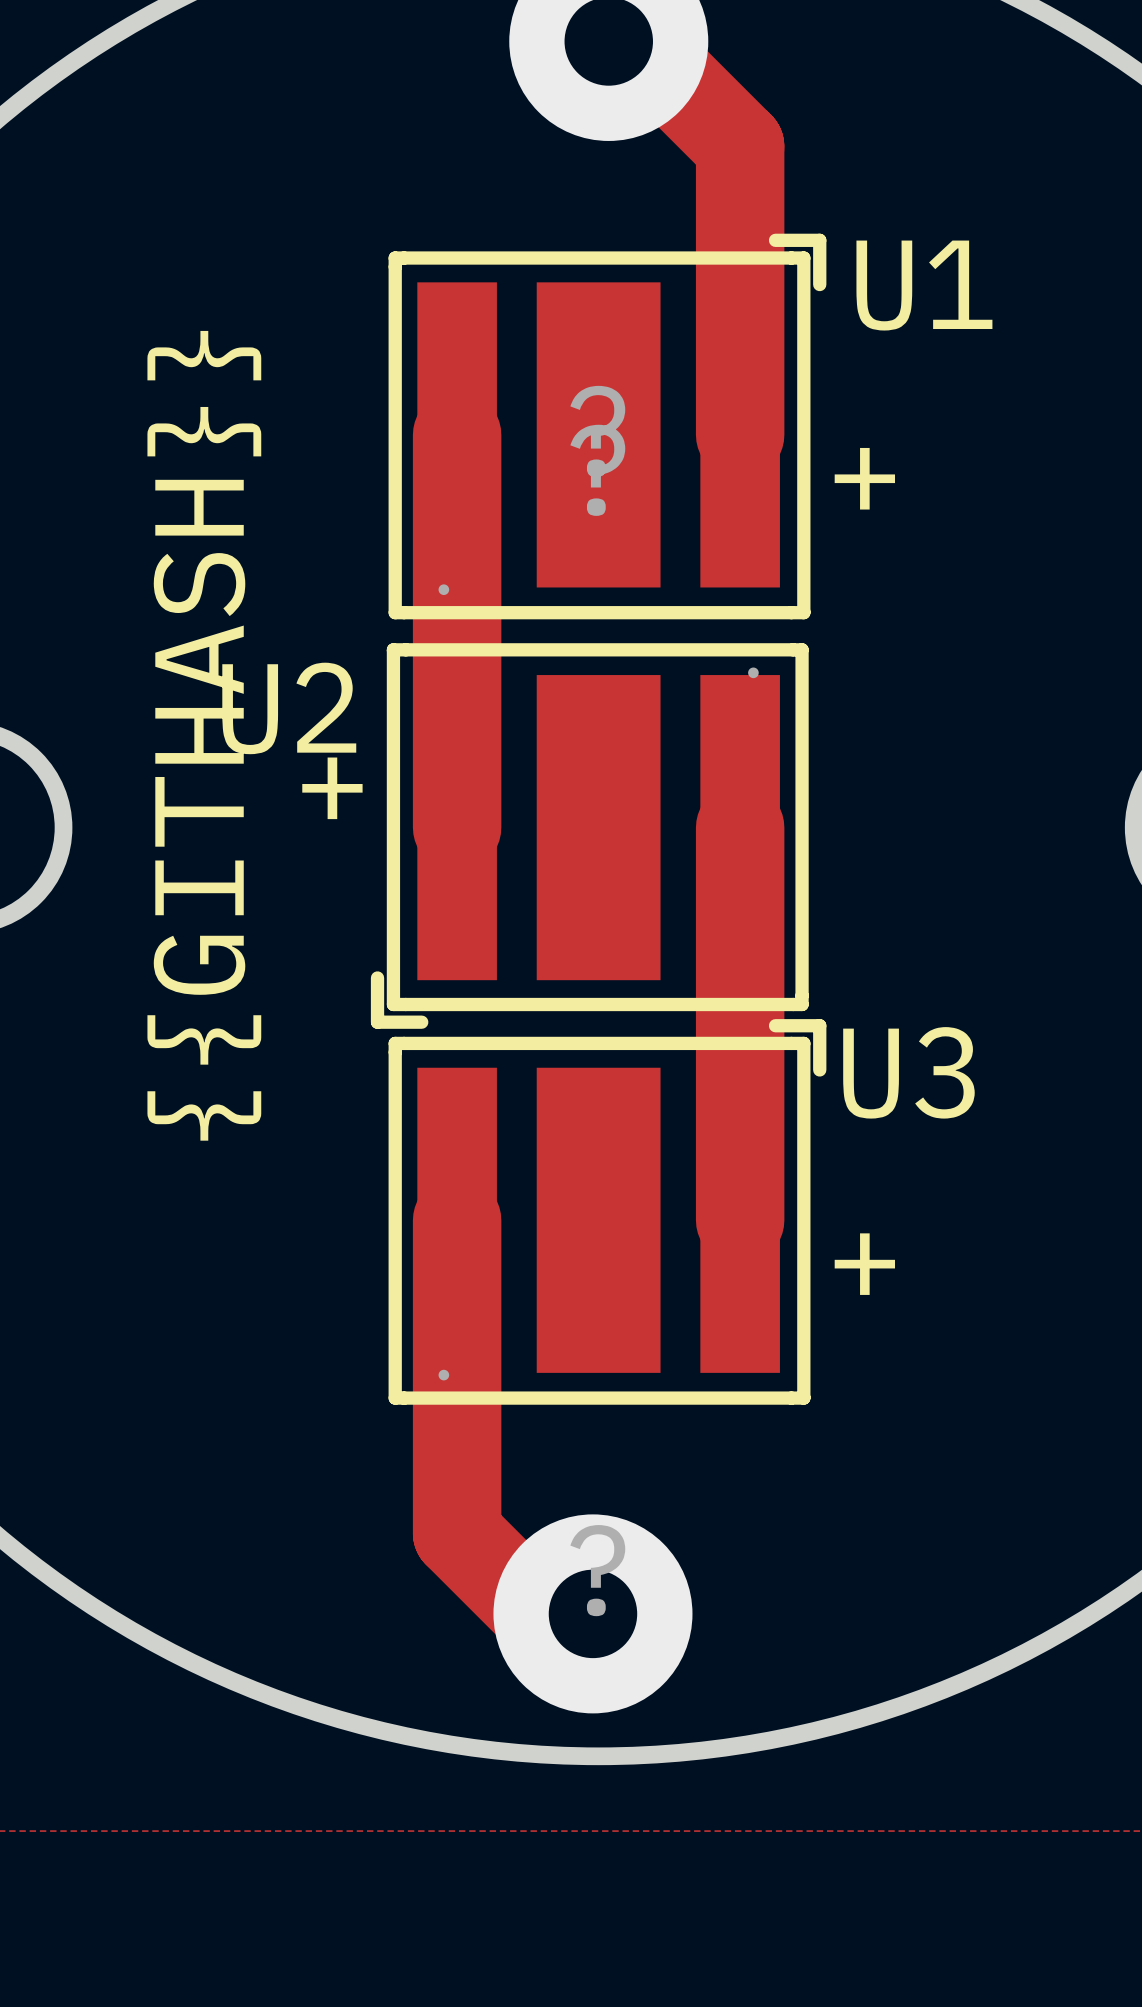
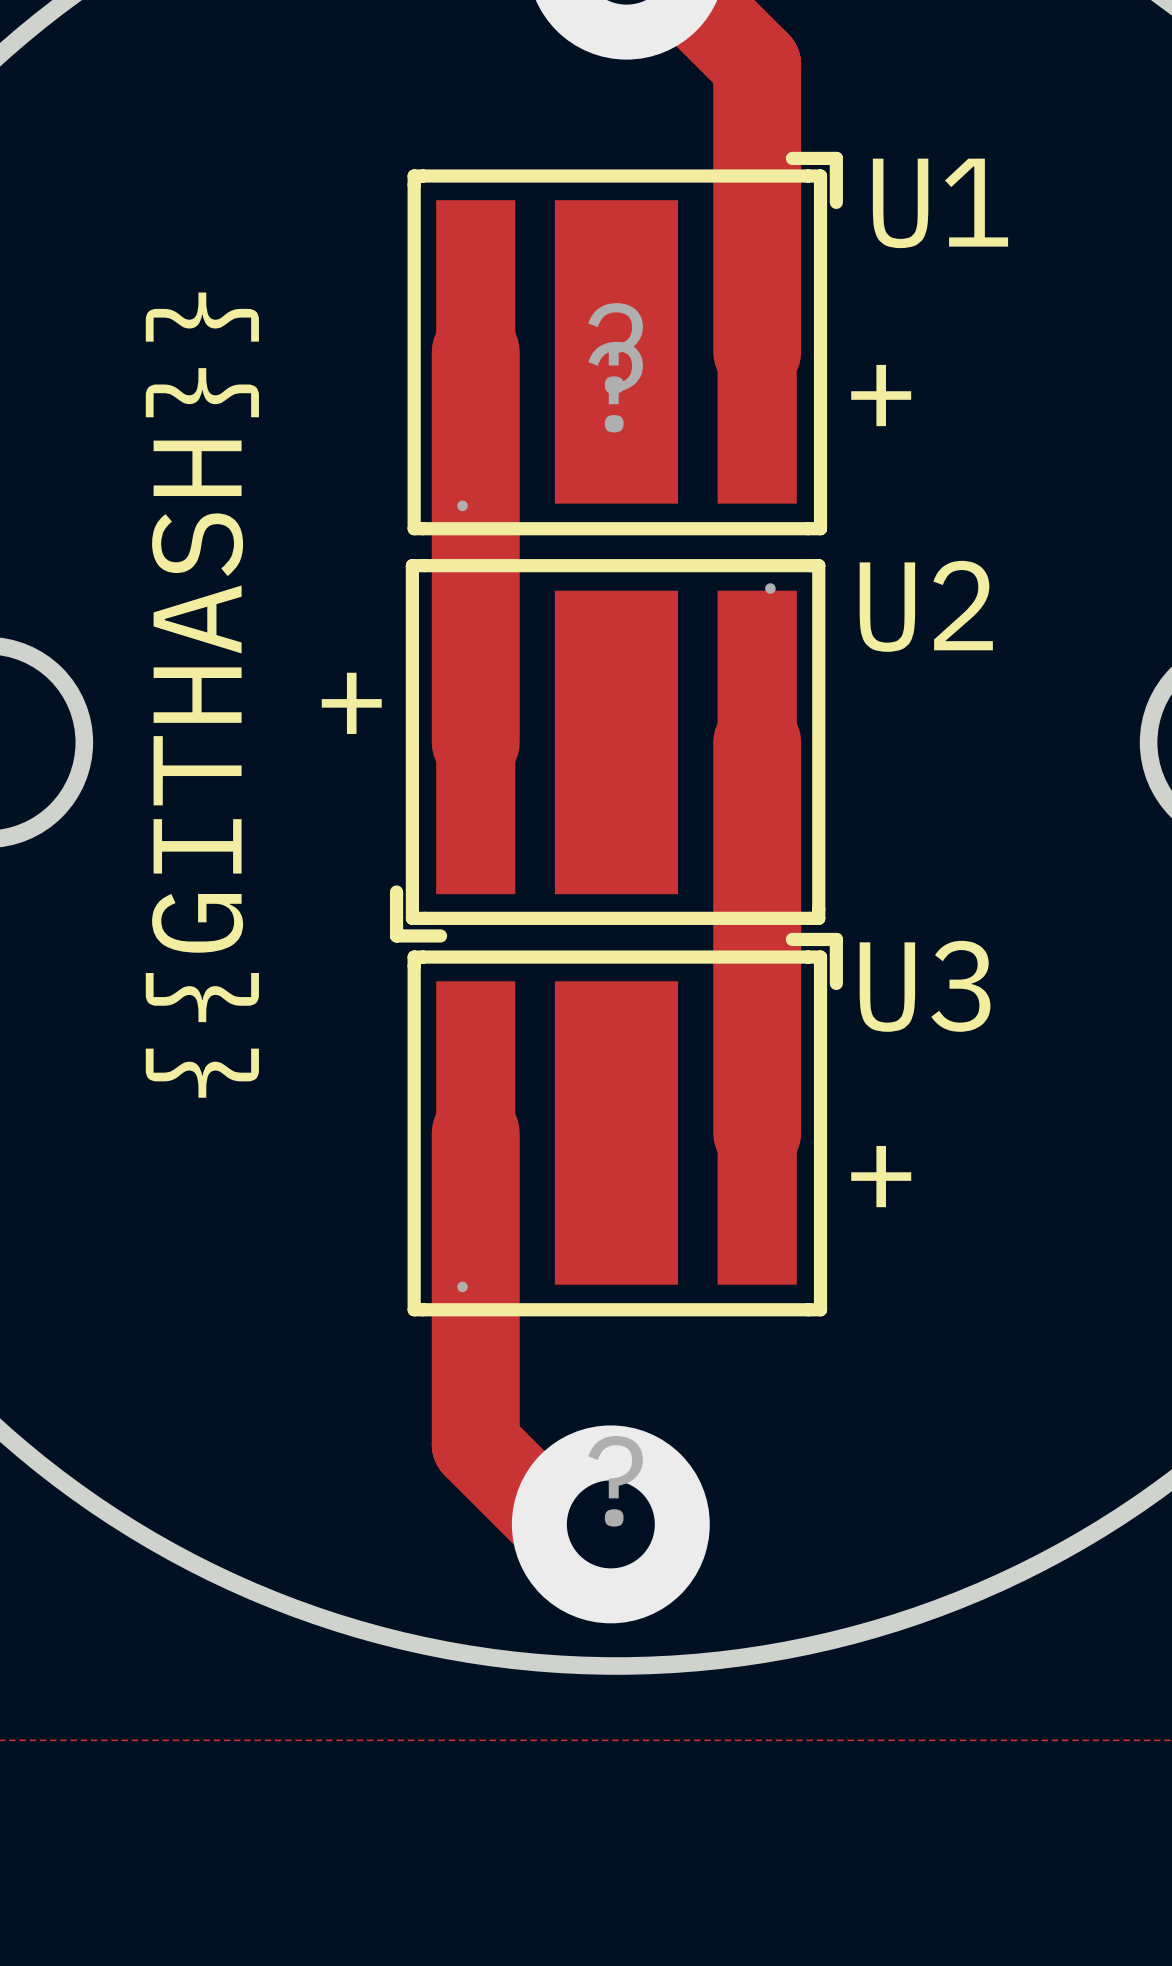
U2 name position: U2 (289, 708) -> U2 (926, 606)
text position: {{GITHASH}} (204, 735) -> {{GITHASH}} (202, 695)

